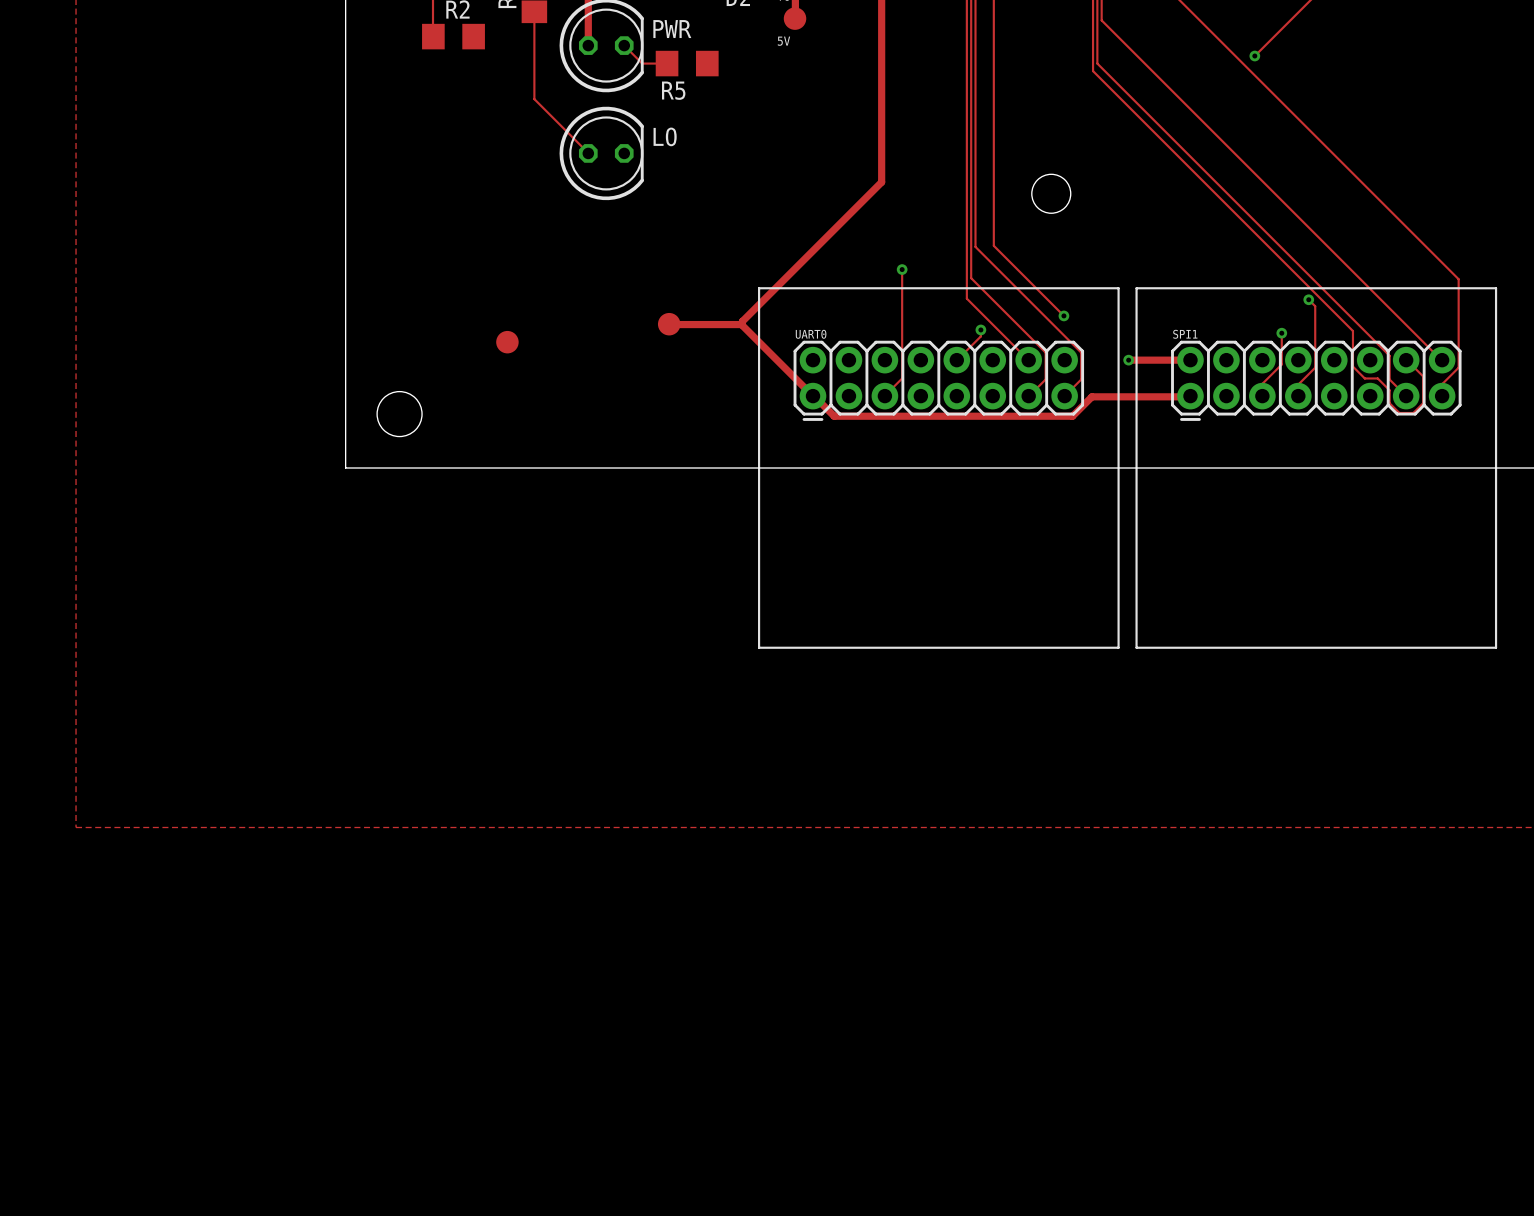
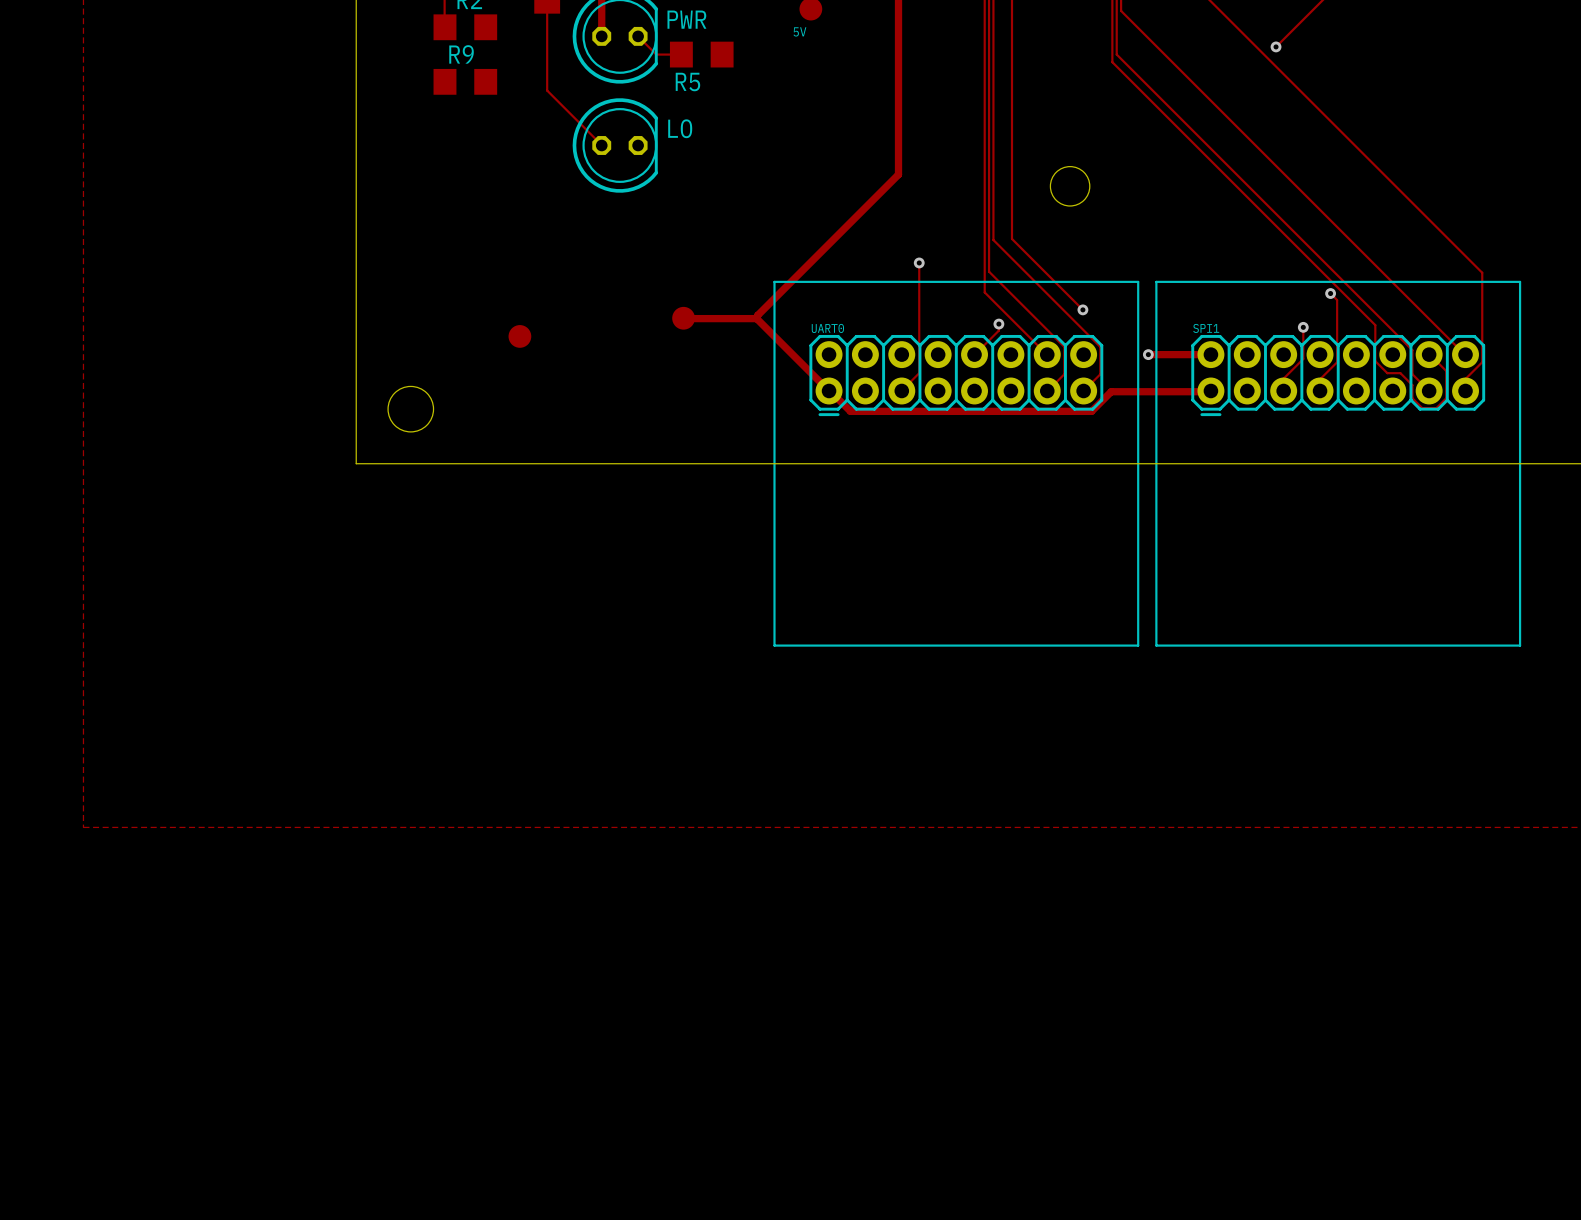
R9: none -> (465, 81)

